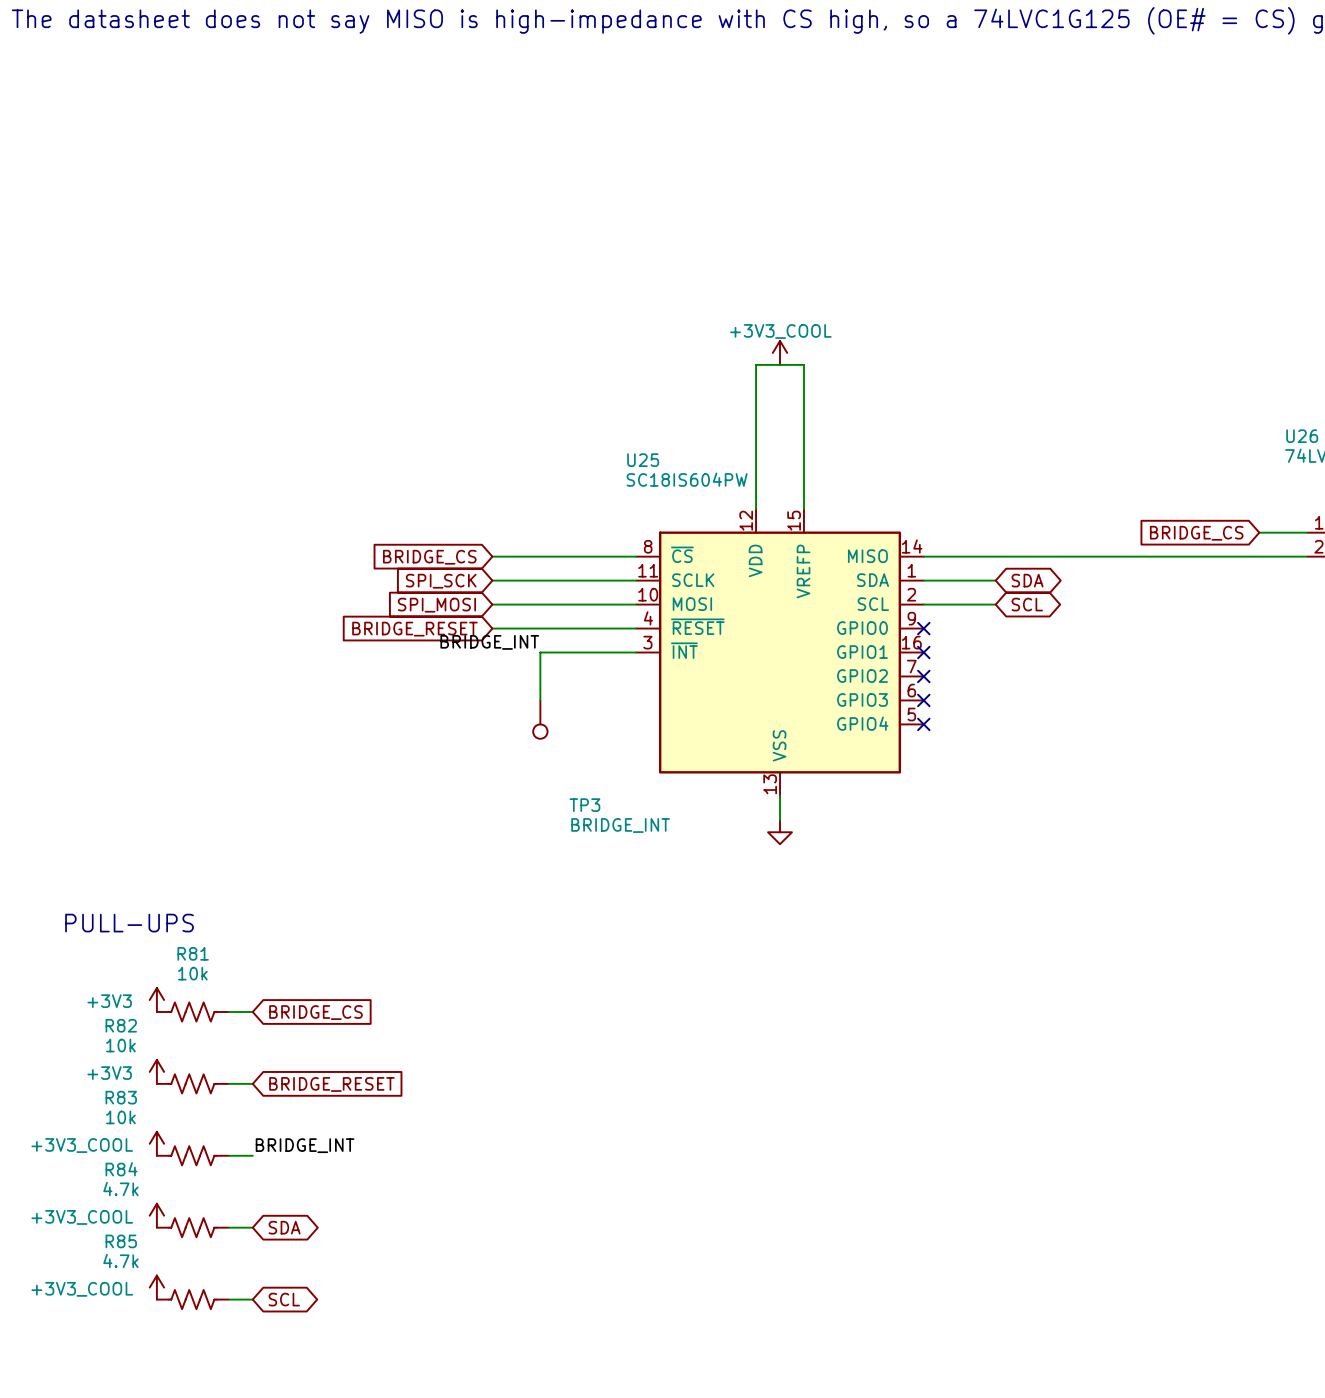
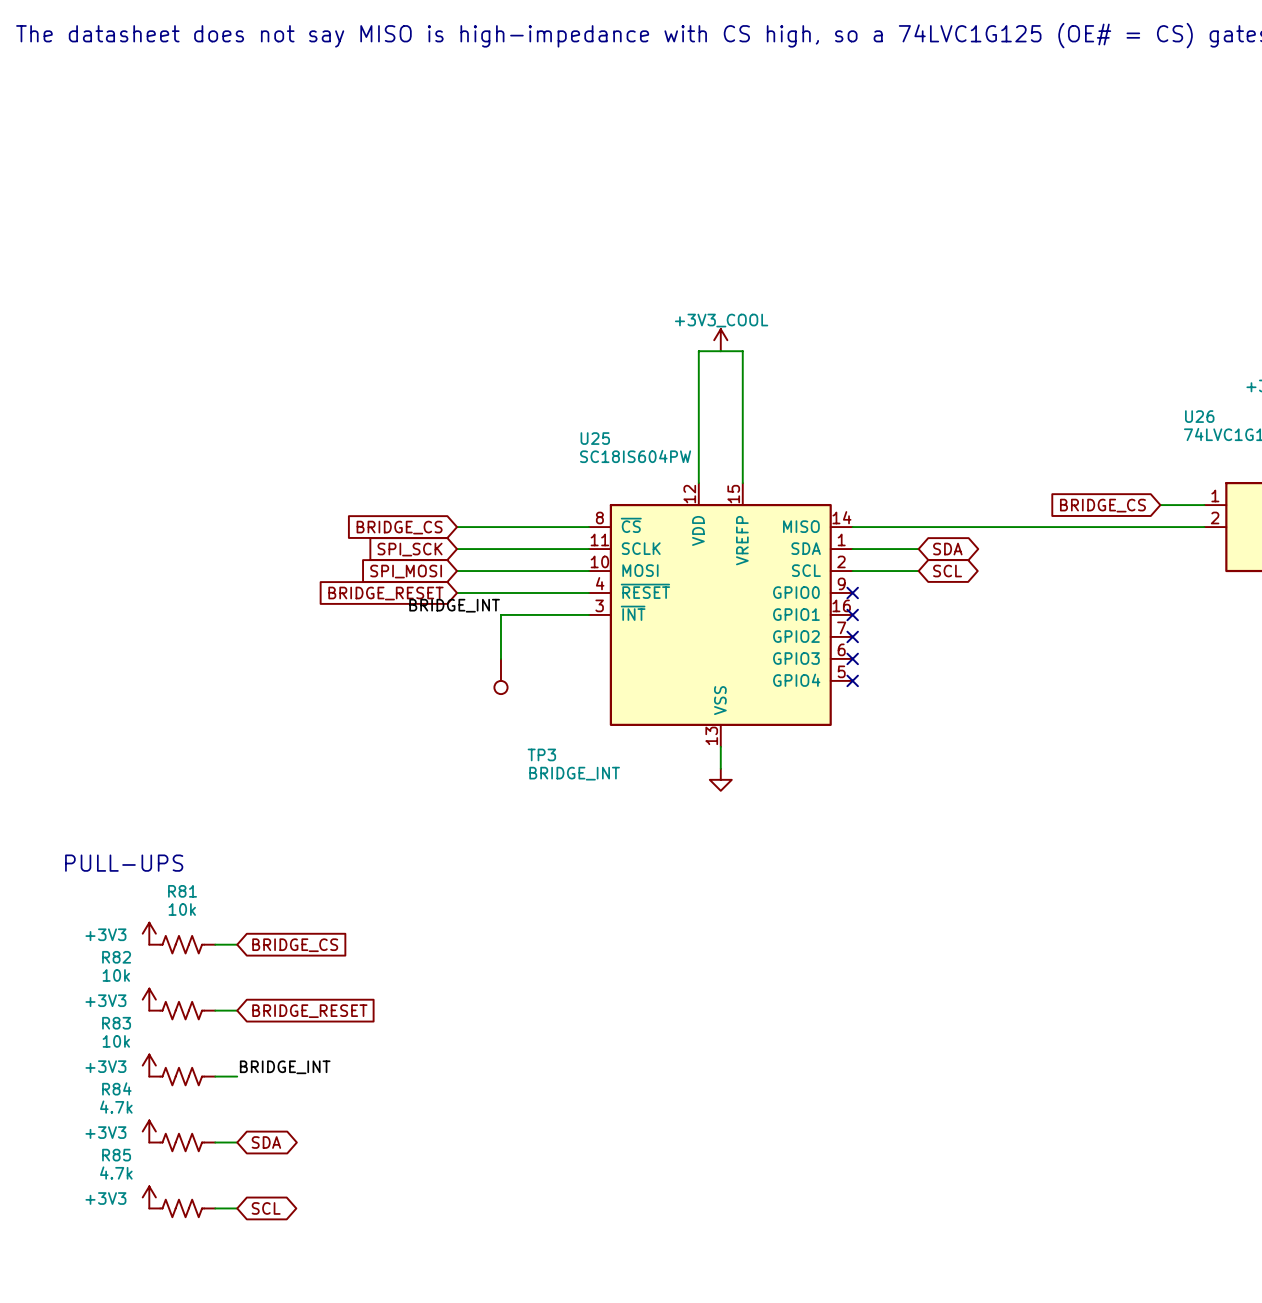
power symbol: +3V3_COOL (156, 1143) -> +3V3 (149, 1065)
power symbol: +3V3_COOL (156, 1215) -> +3V3 (149, 1131)
power symbol: +3V3_COOL (156, 1287) -> +3V3 (149, 1197)

